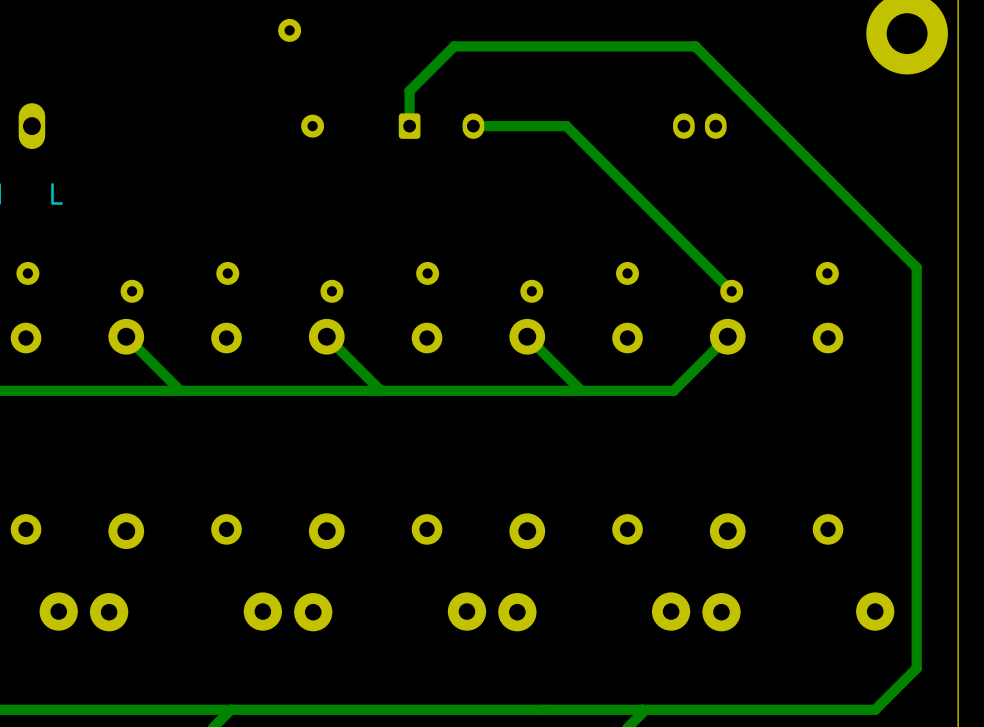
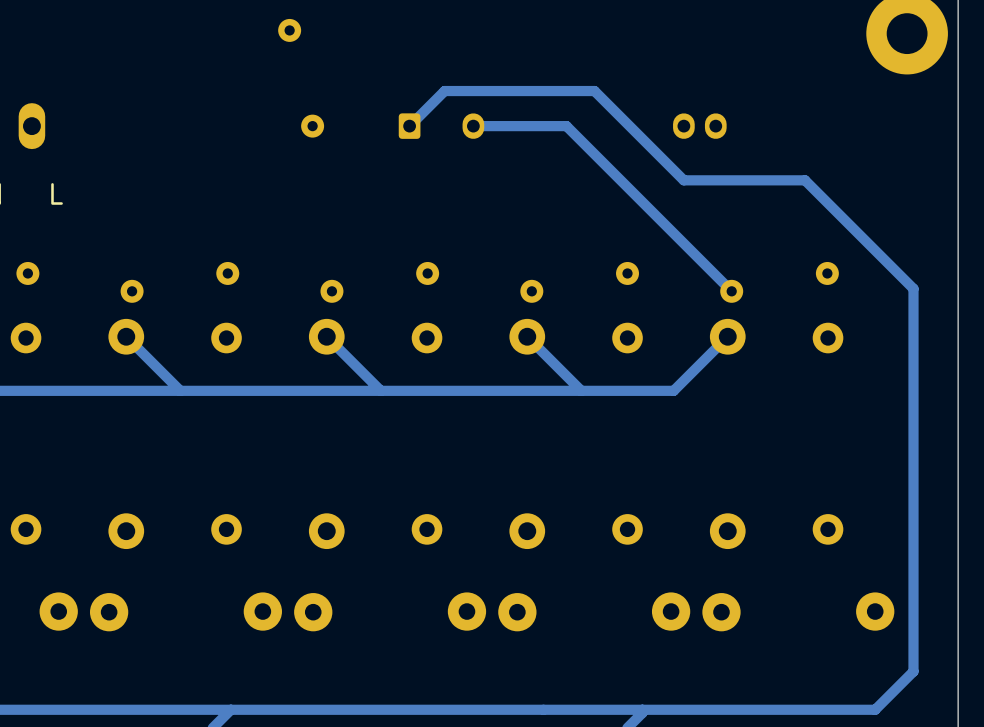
track: (409, 126) (409, 91) (454, 46) (695, 46) (916, 267) (916, 668) (913, 671) -> (409, 126) (444, 91) (594, 91) (683, 180) (805, 180) (913, 288) (913, 671)

